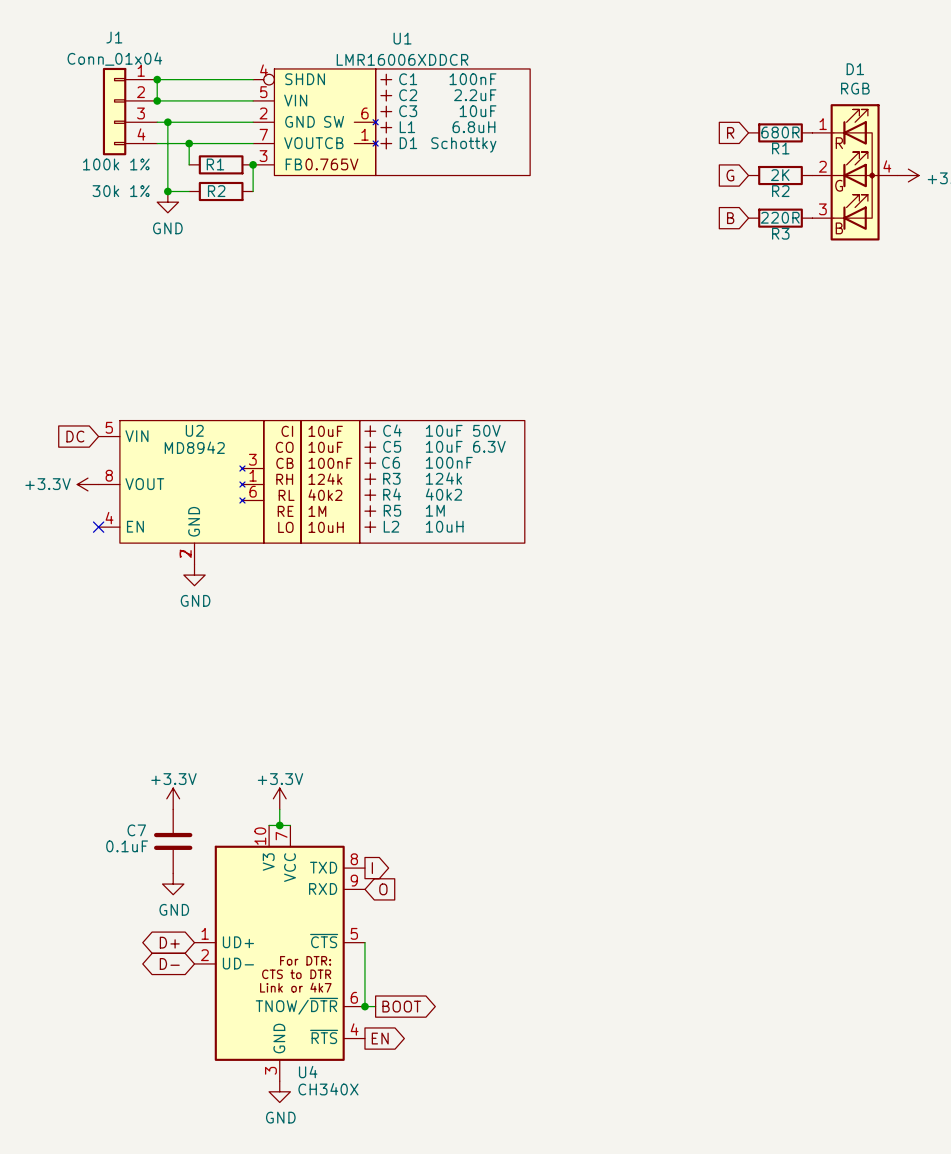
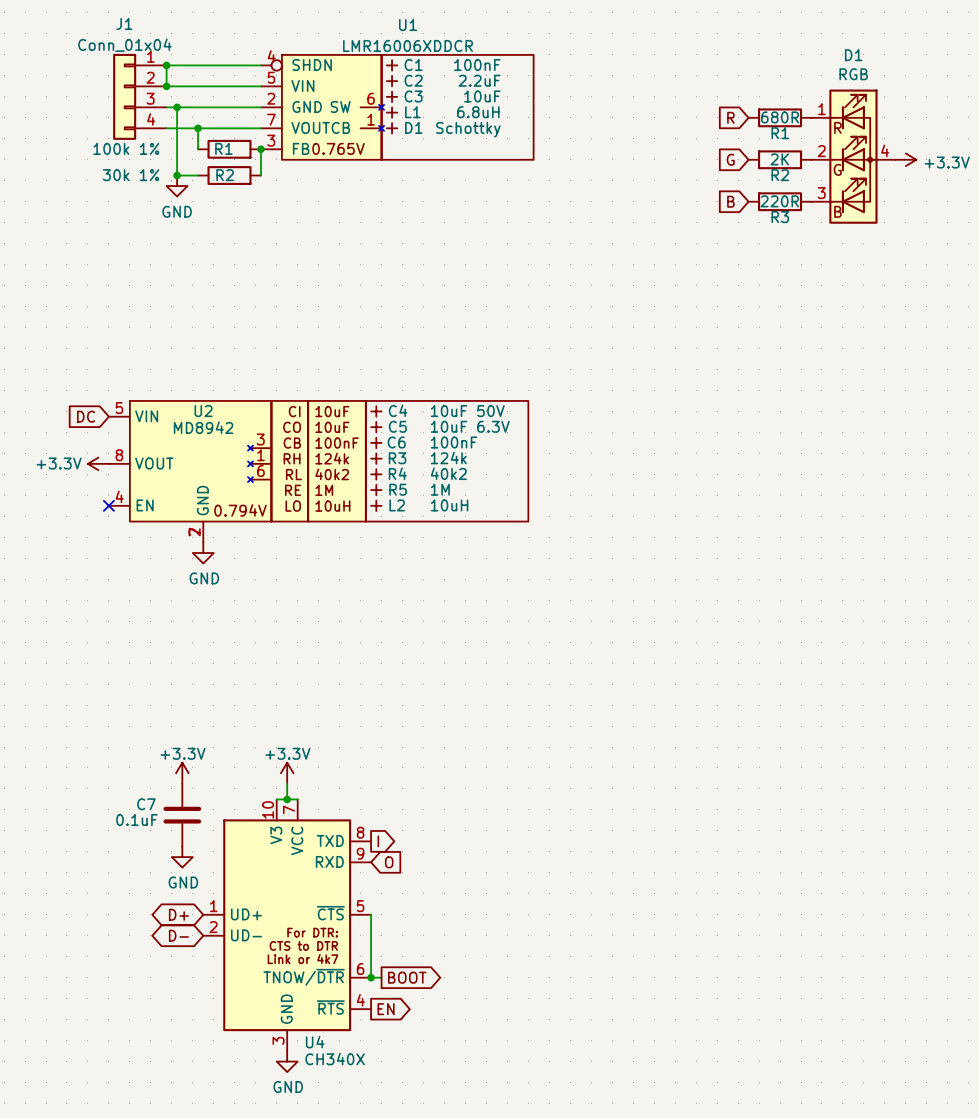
U2 text: none -> 0.794V (240, 510)

